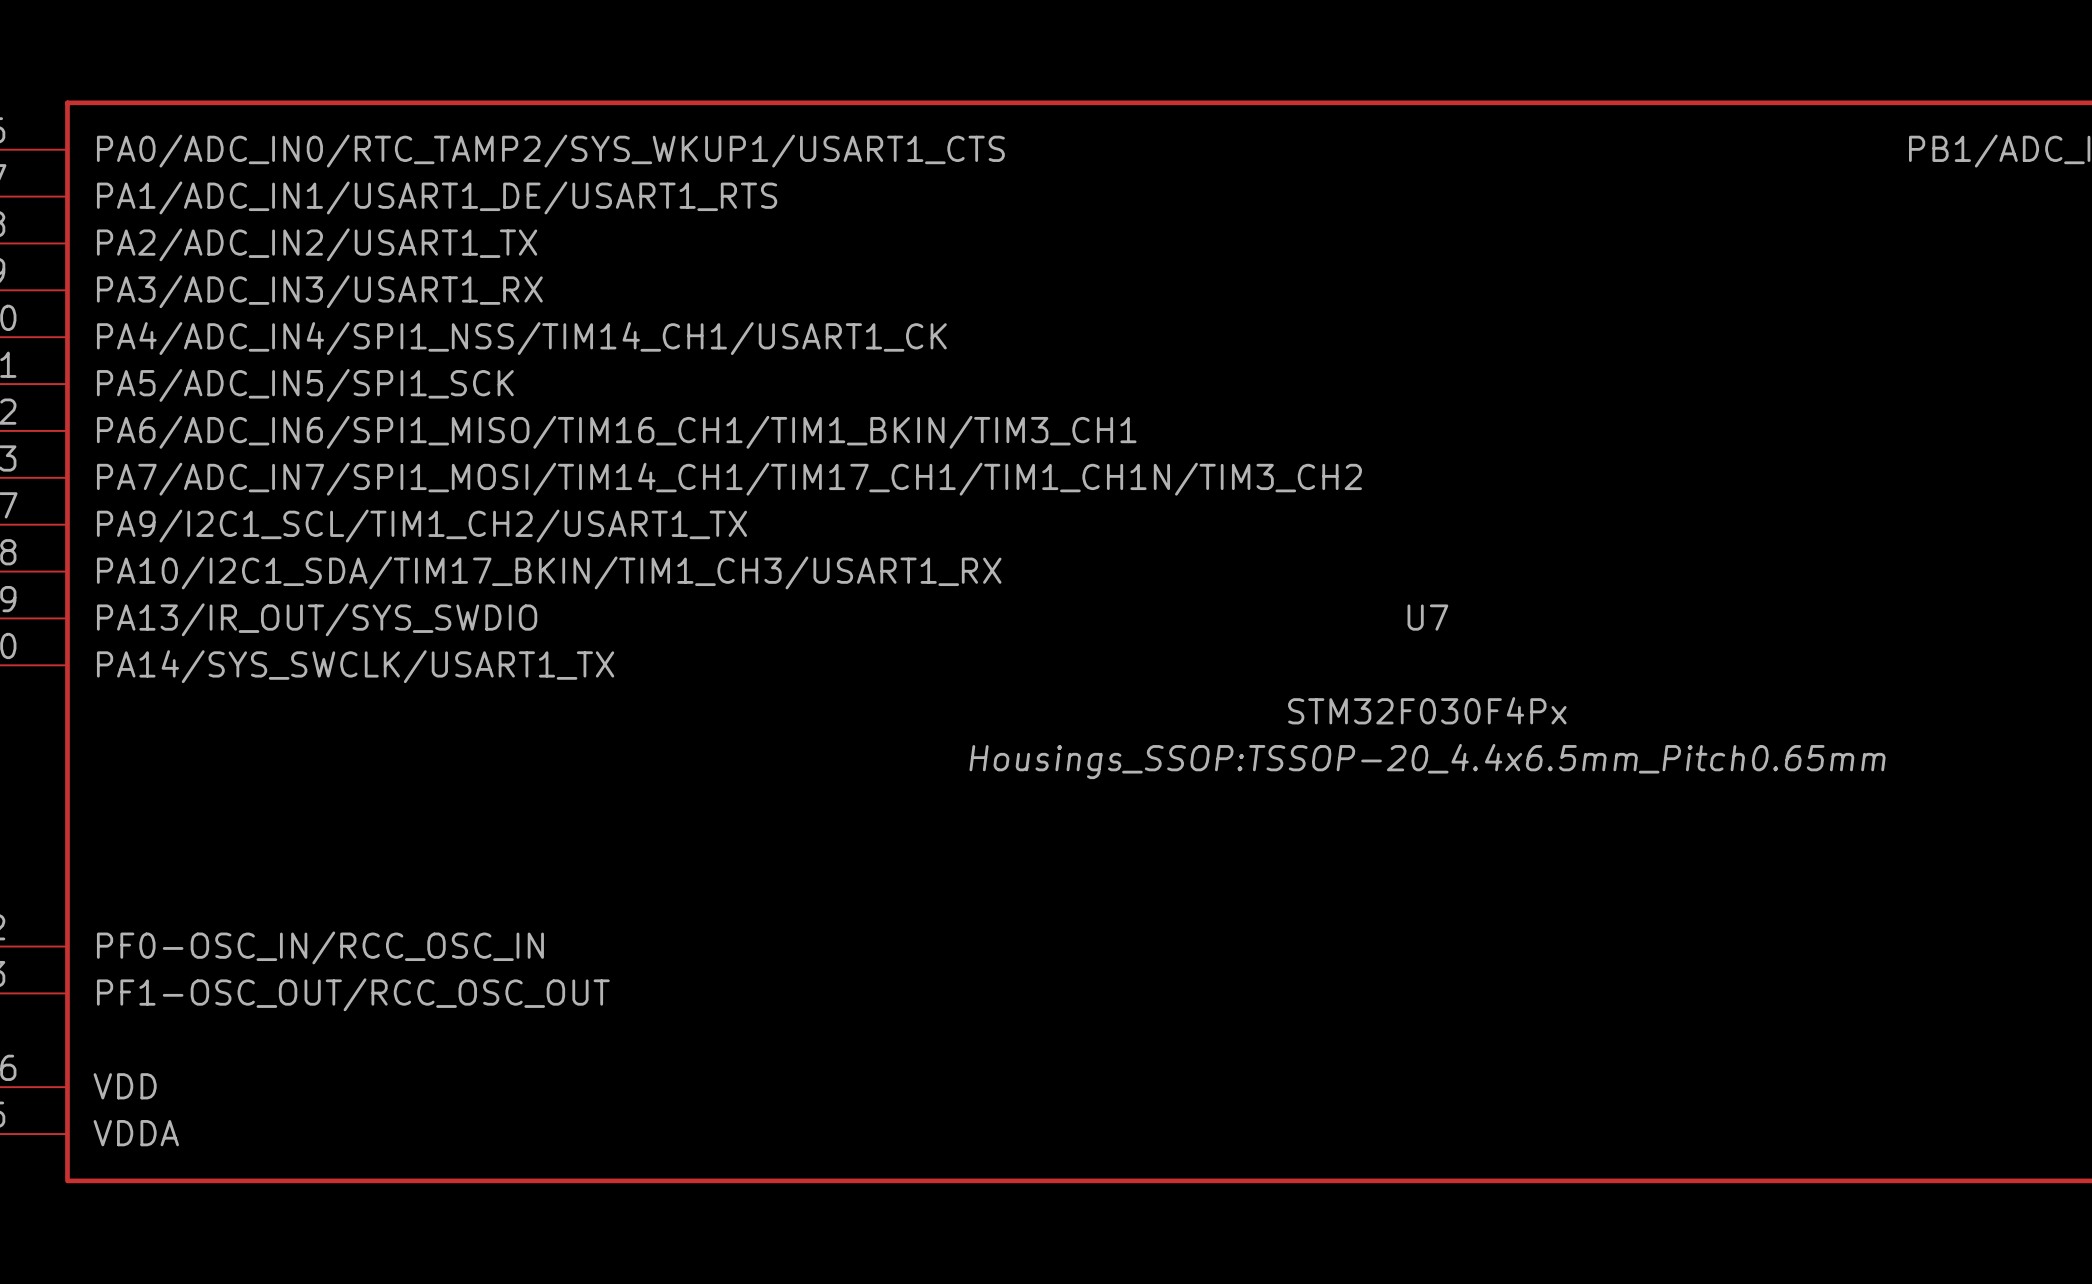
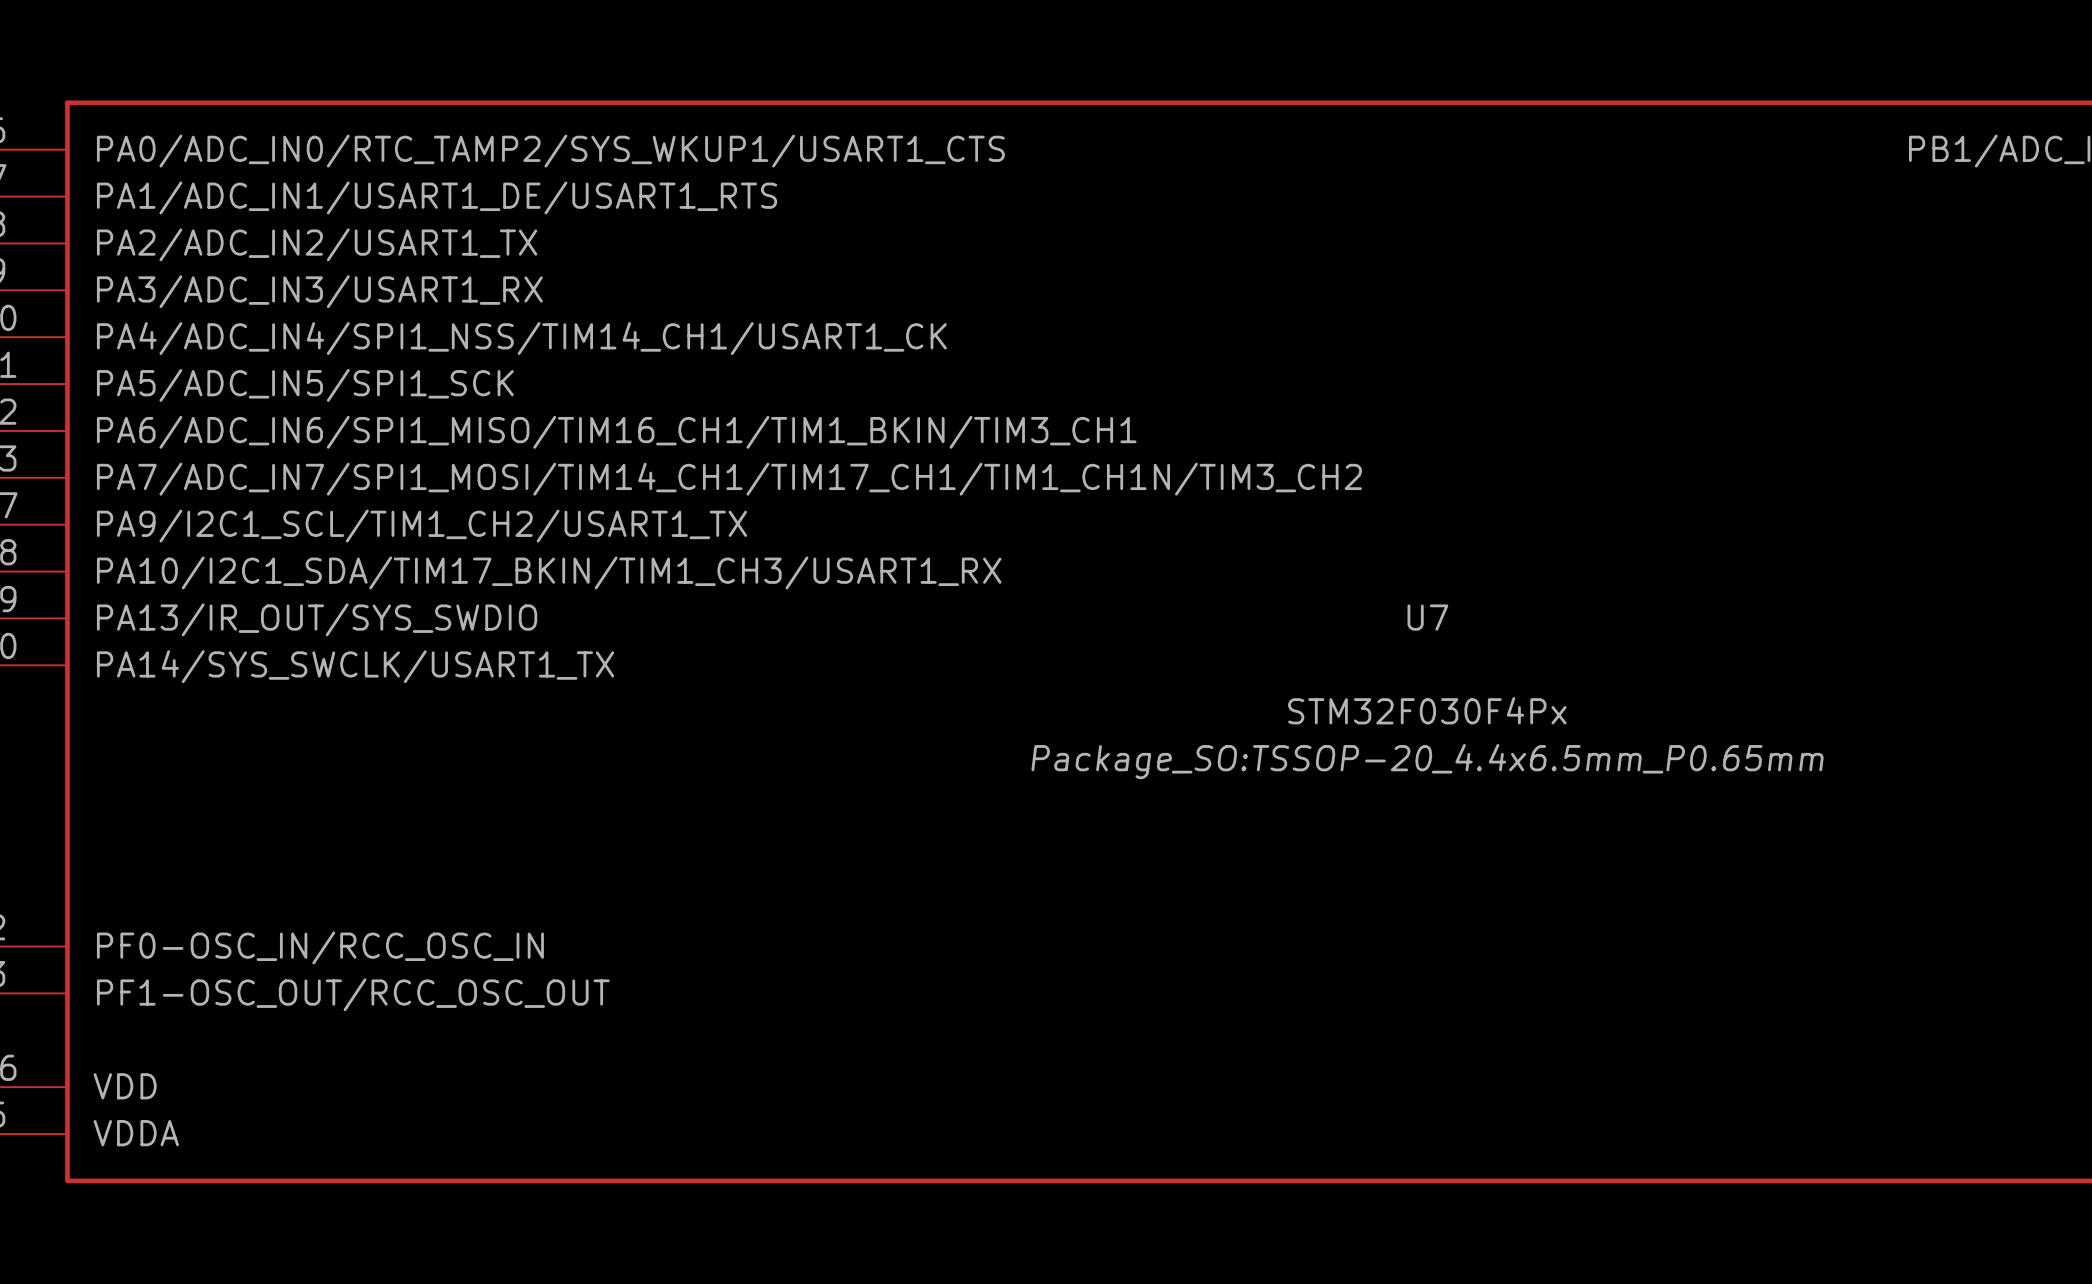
U7 text: Housings_SSOP:TSSOP-20_4.4x6.5mm_Pitch0.65mm (1427, 761) -> Package_SO:TSSOP-20_4.4x6.5mm_P0.65mm (1427, 761)

